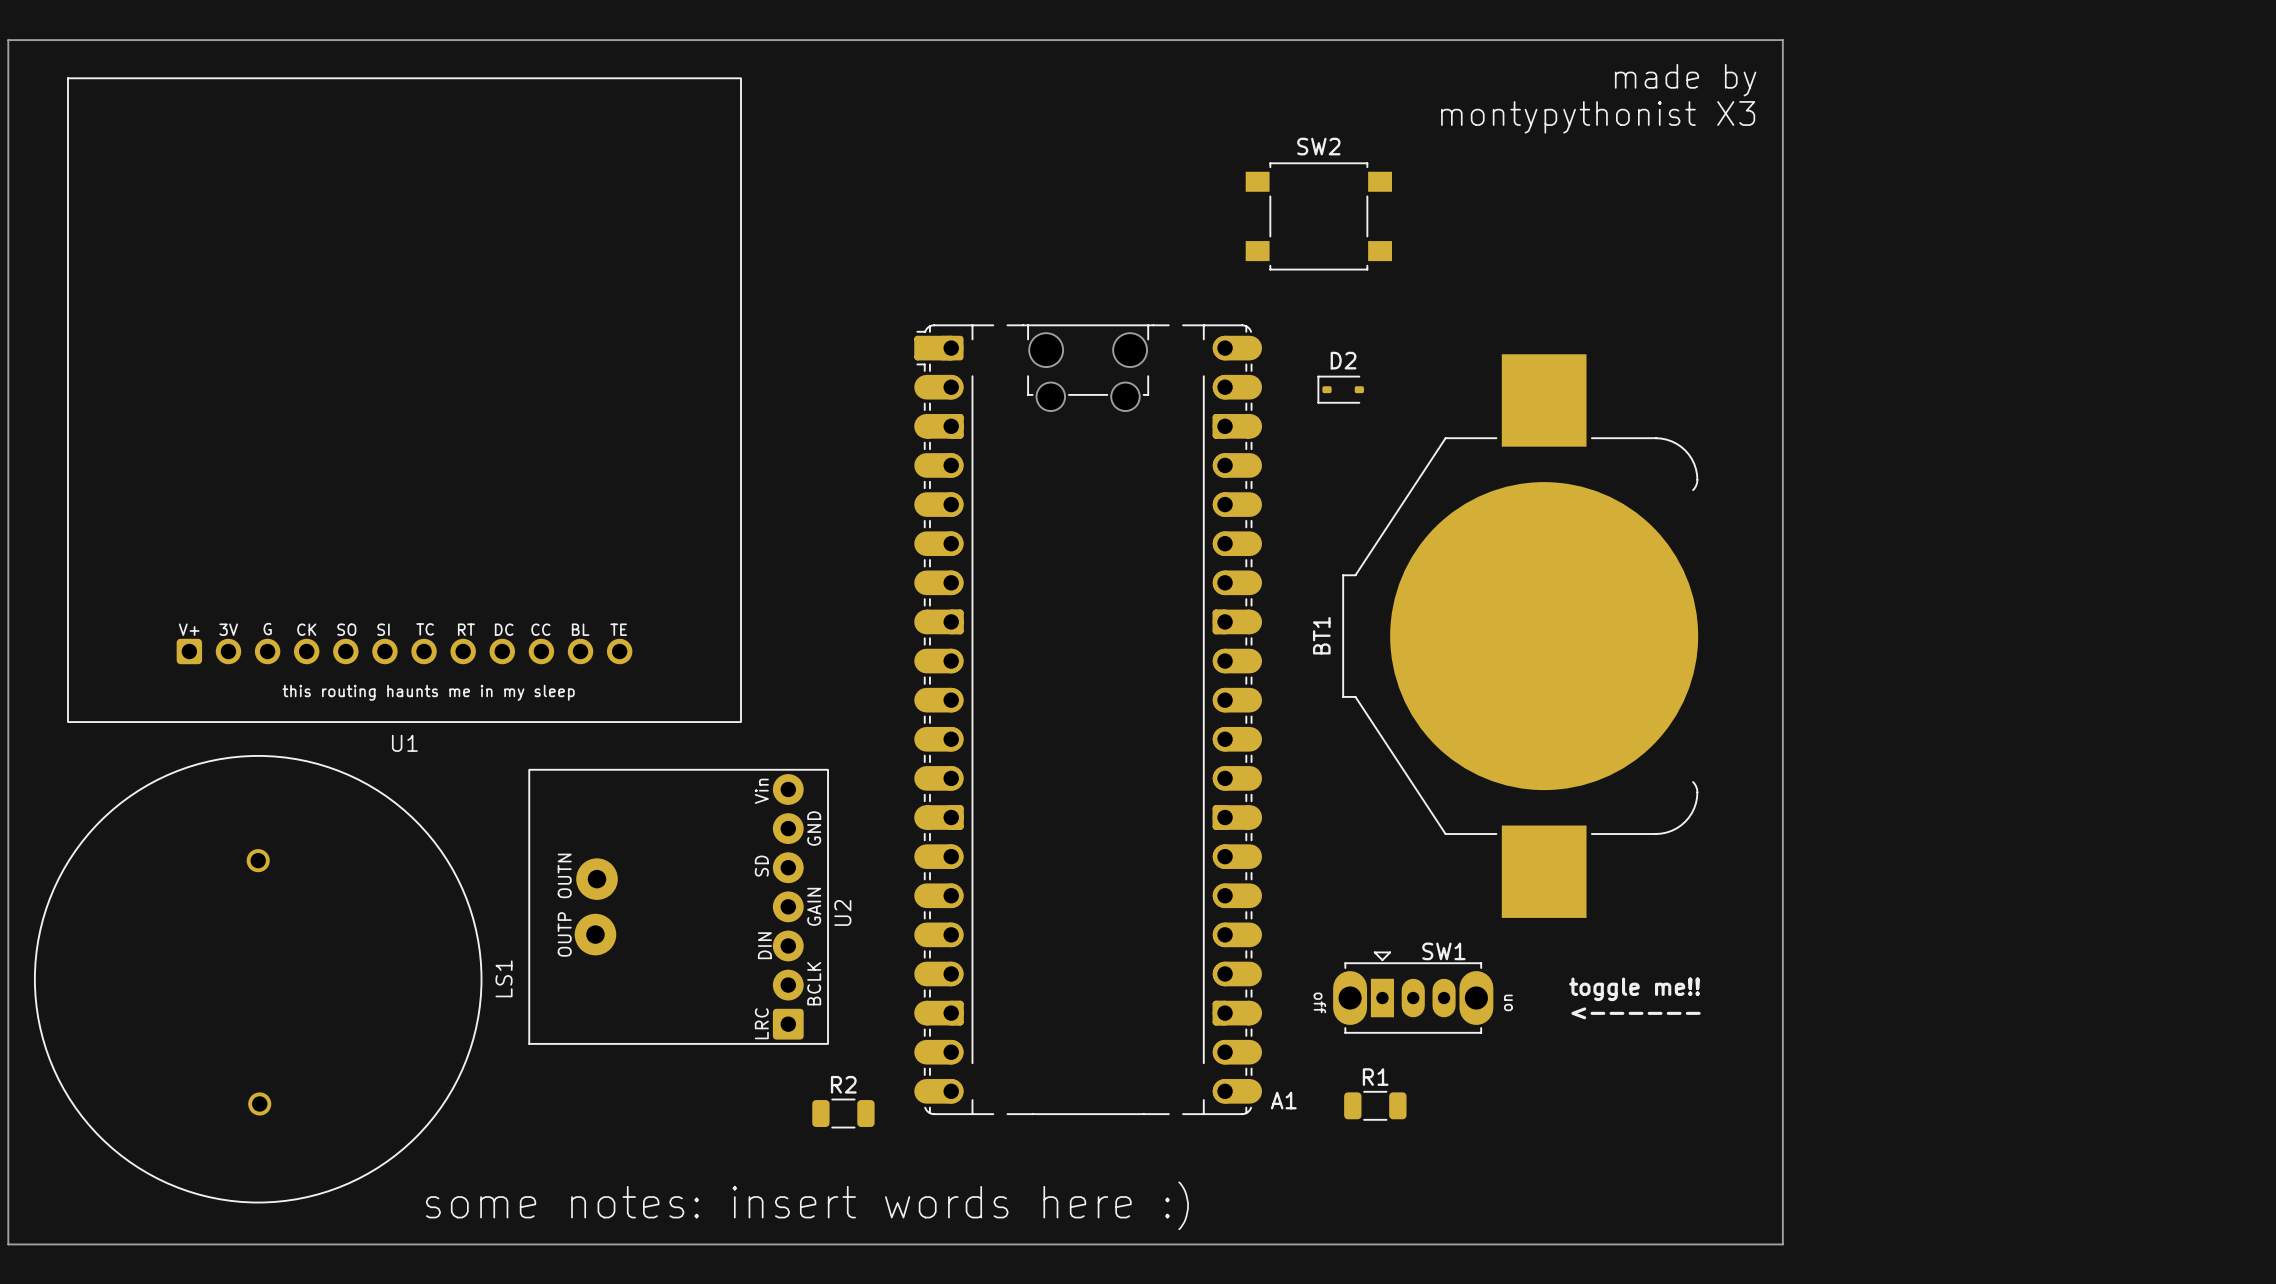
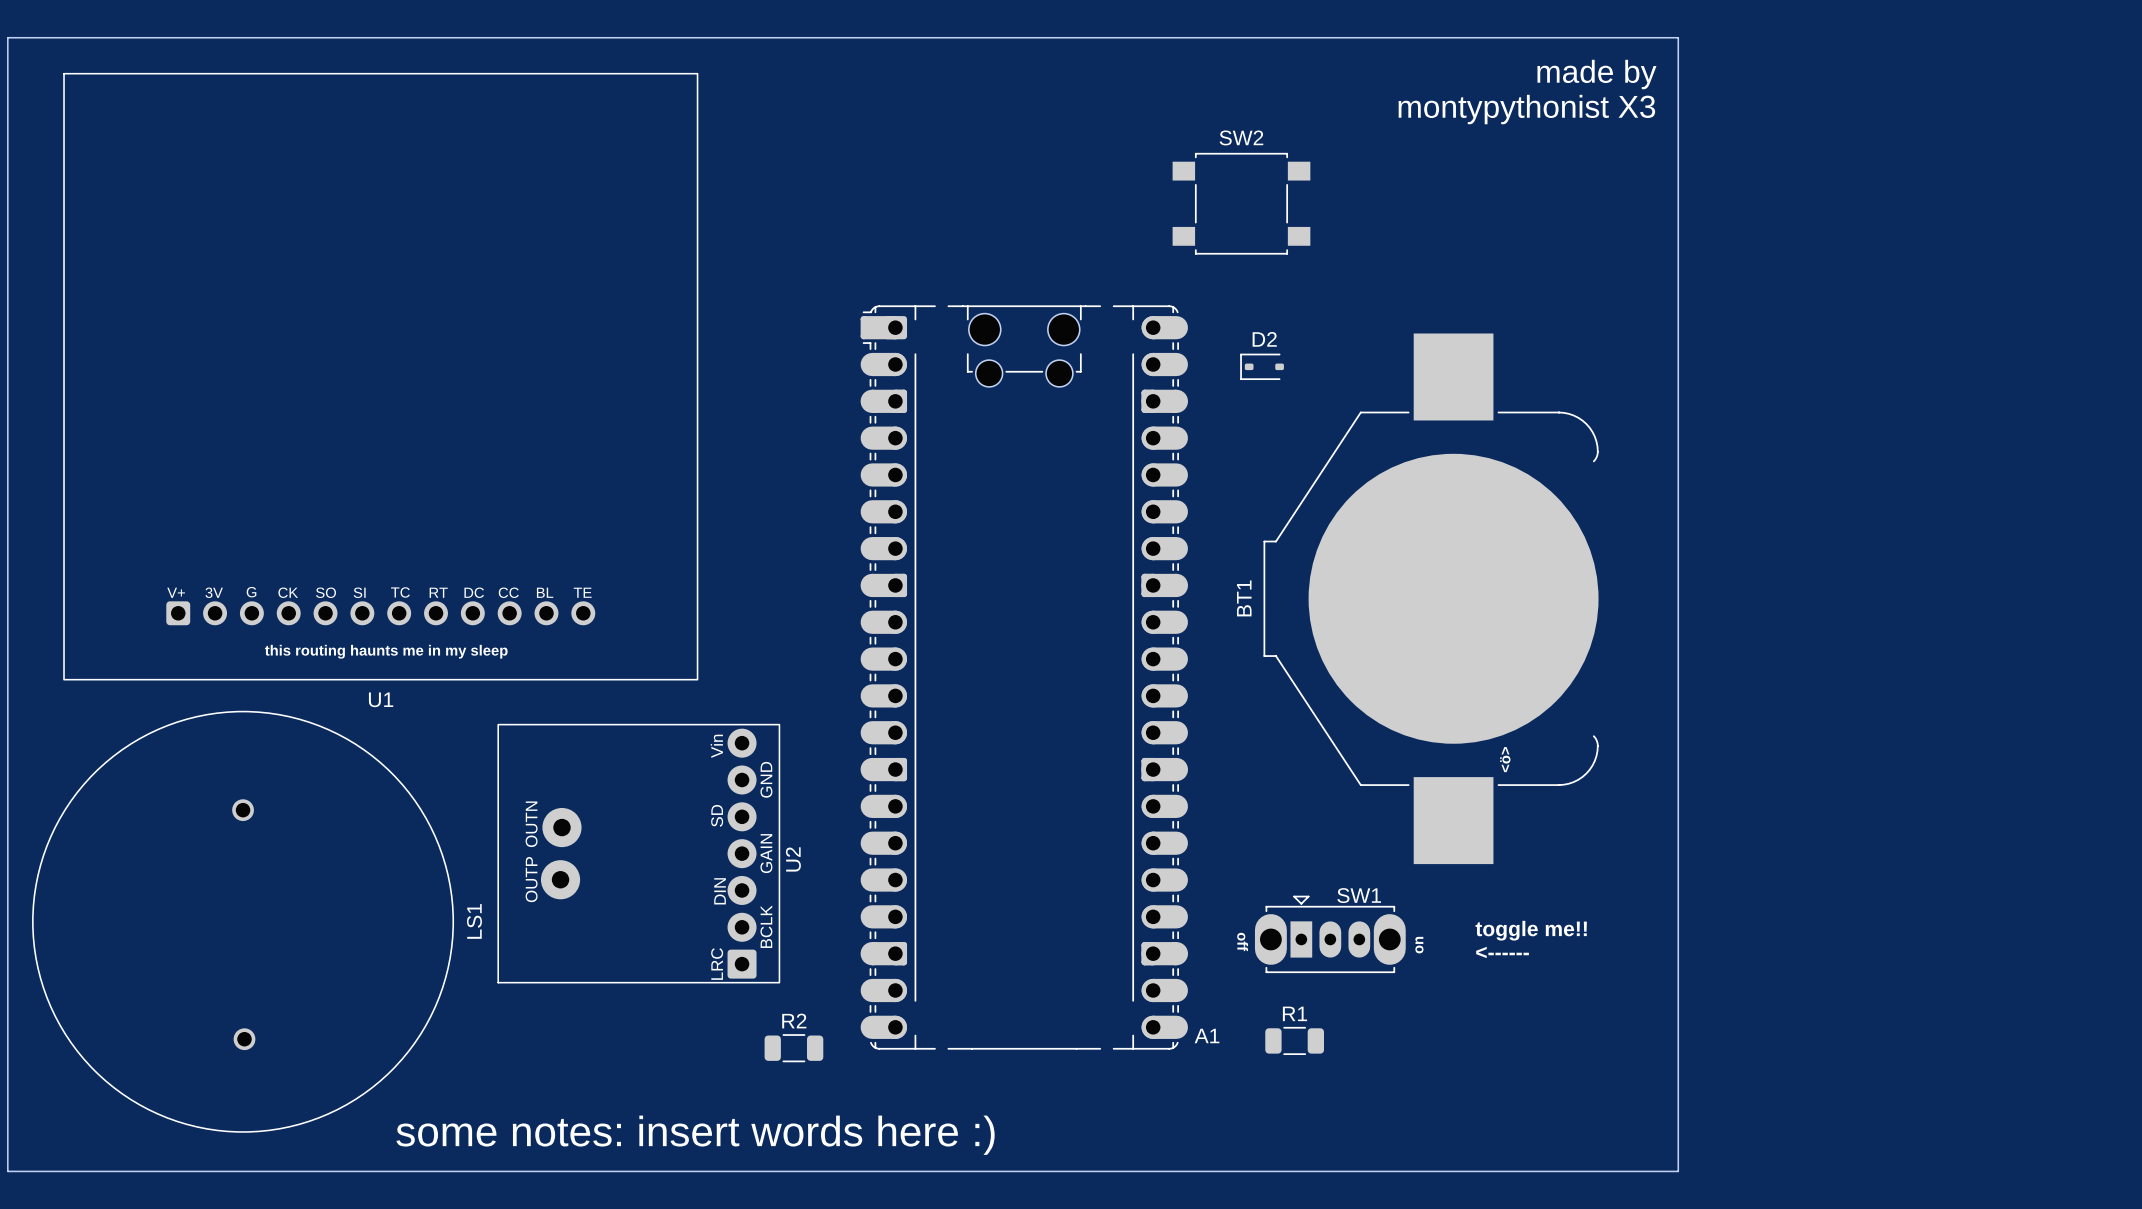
text: none -> <ö> (1505, 759)

